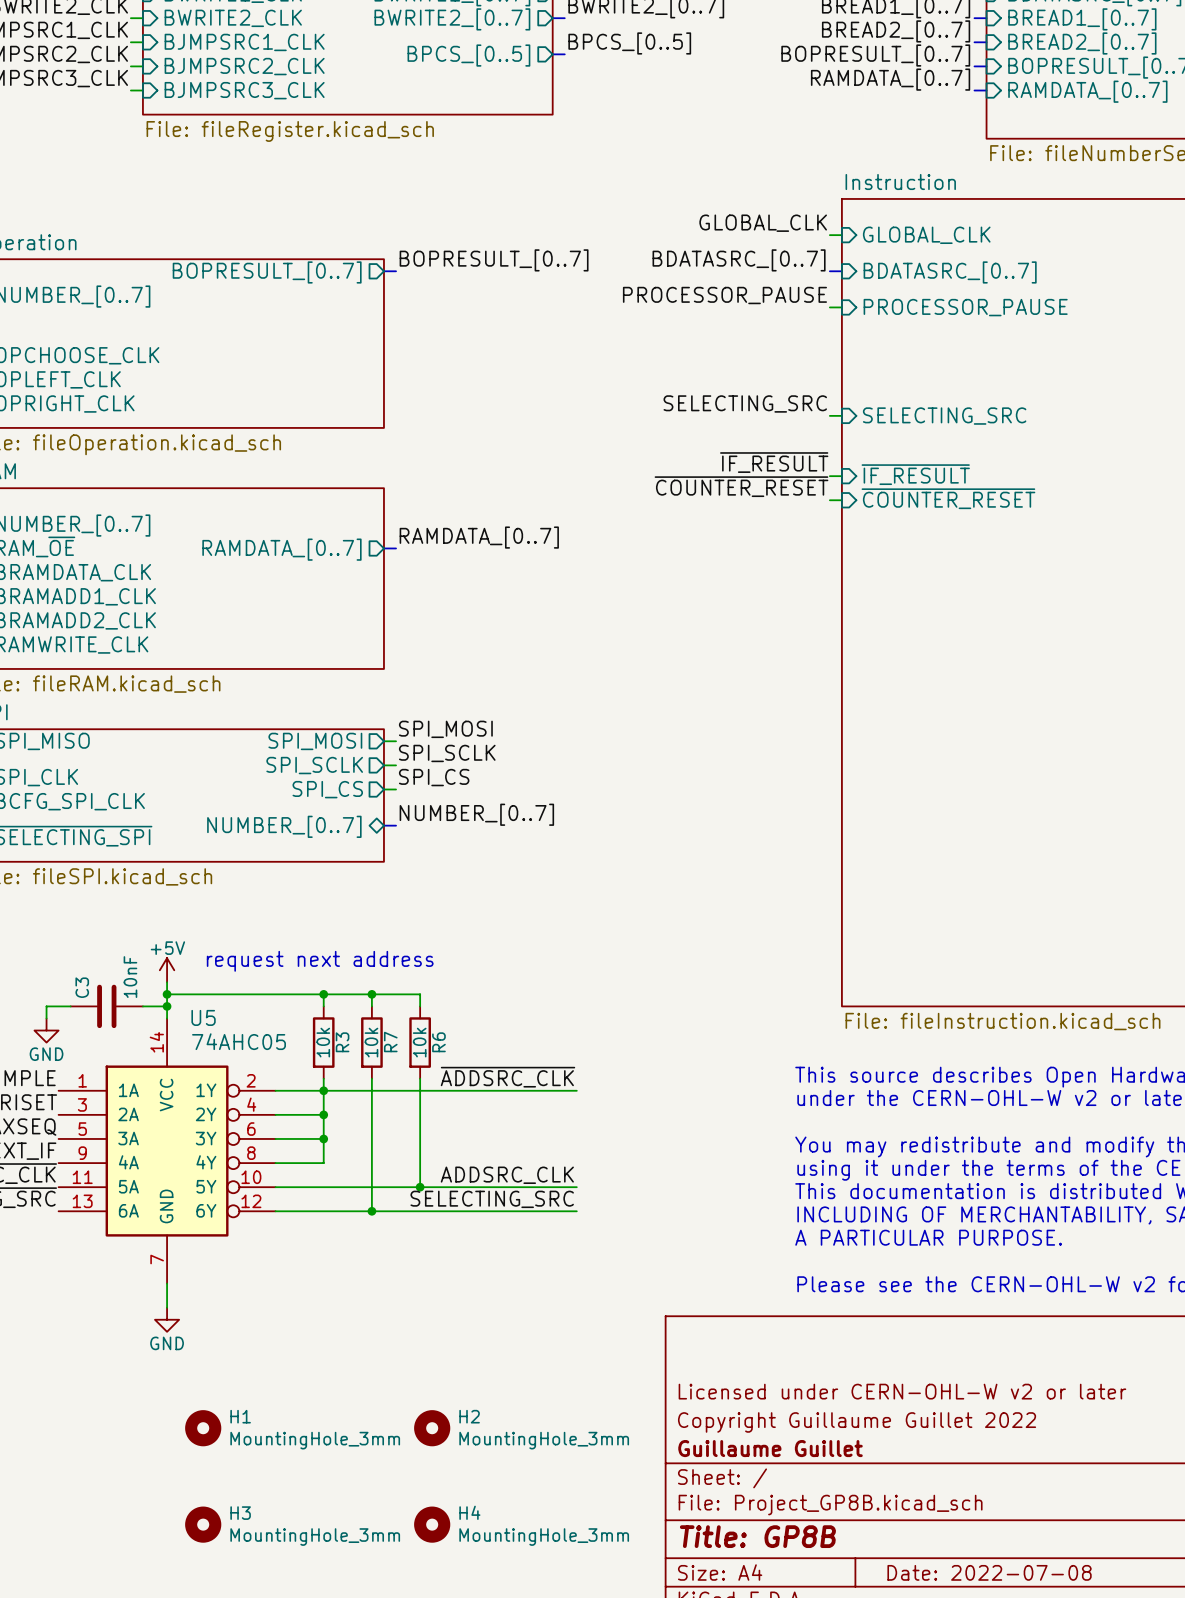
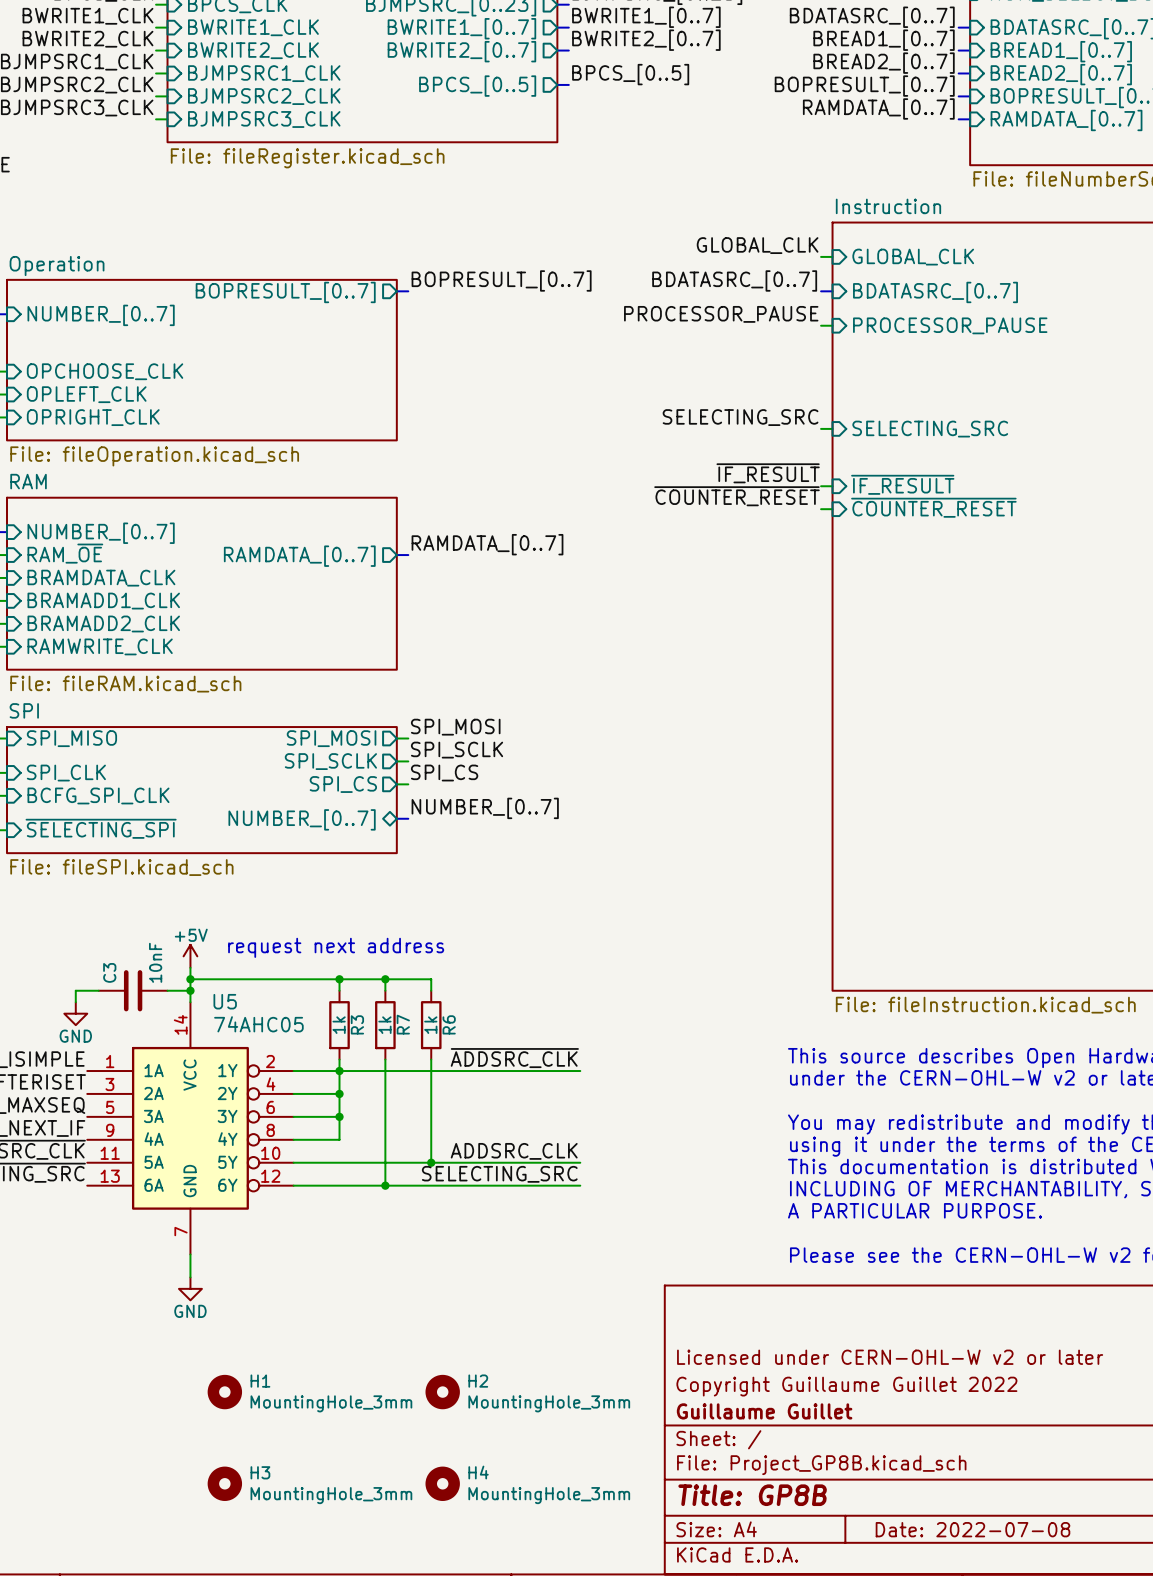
R3 value: 10k (323, 1042) -> 1k (339, 1025)
R7 value: 10k (371, 1042) -> 1k (384, 1025)
R6 value: 10k (419, 1042) -> 1k (430, 1025)

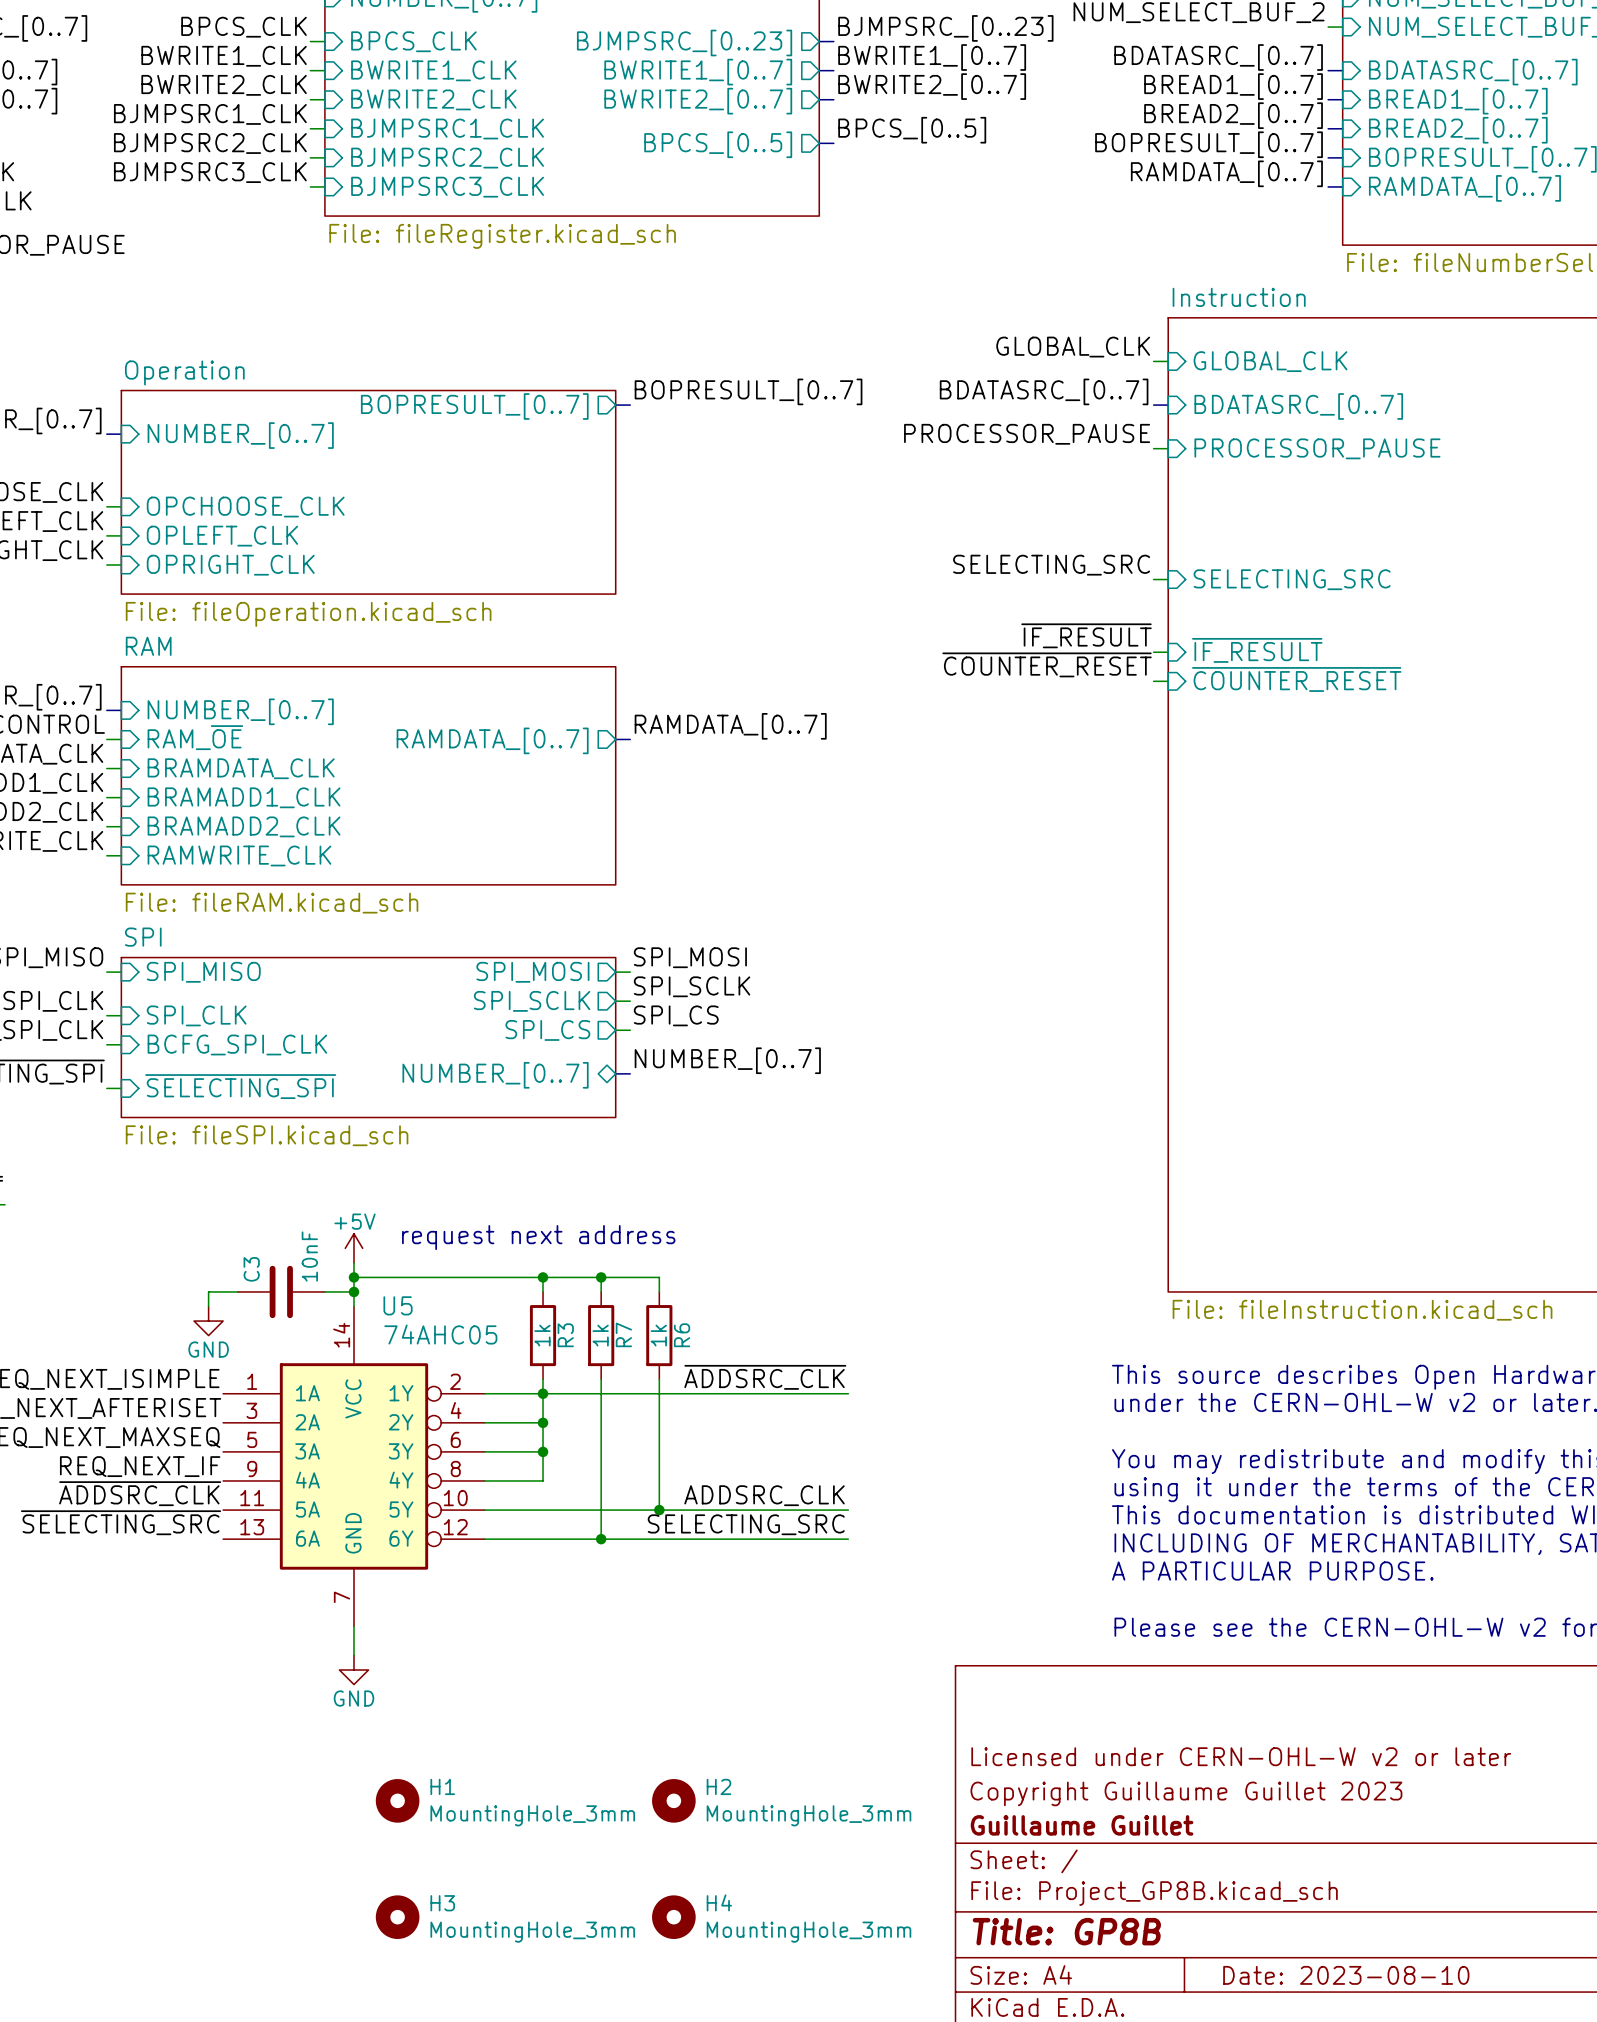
title block: Copyright Guillaume Guillet 2022 (846, 1386) -> Copyright Guillaume Guillet 2023 (1186, 1793)
title block: Date: 2022-07-08 (972, 1529) -> Date: 2023-08-10 (1346, 1975)

